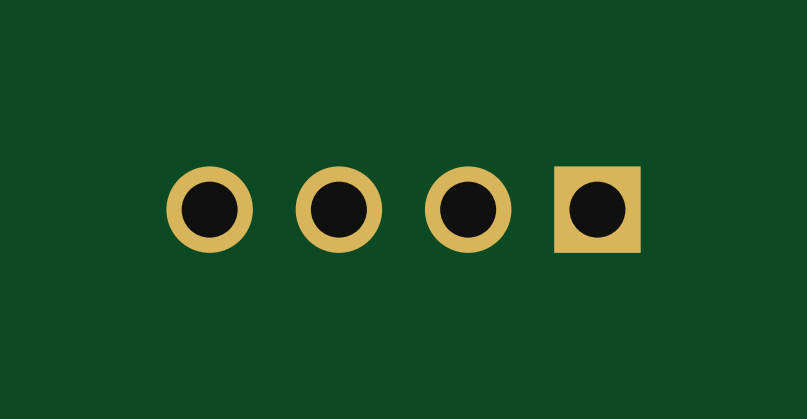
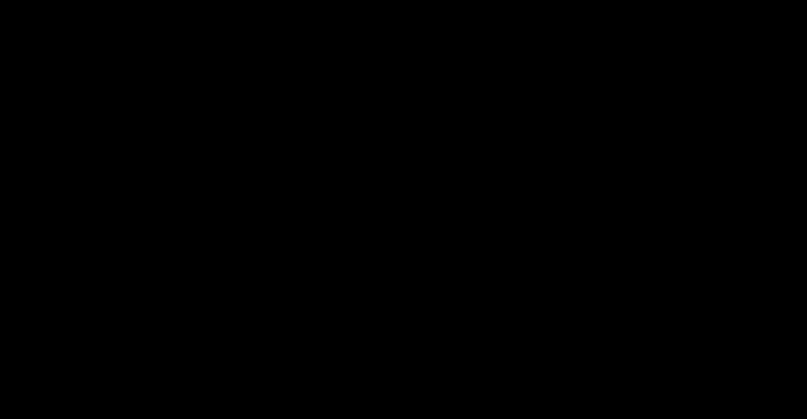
part: (403, 209) -> none

